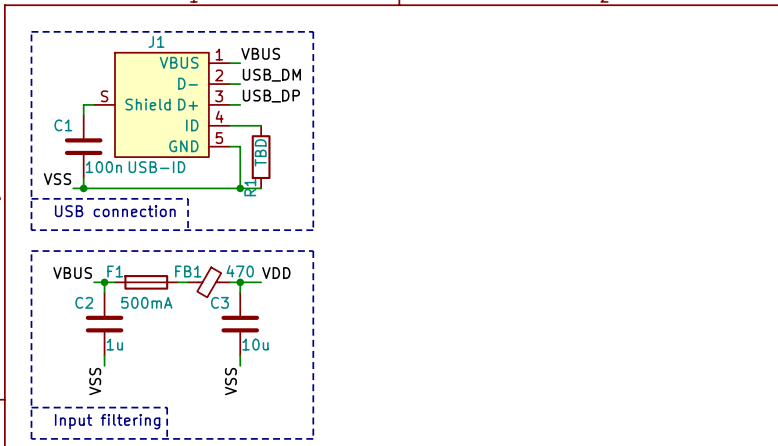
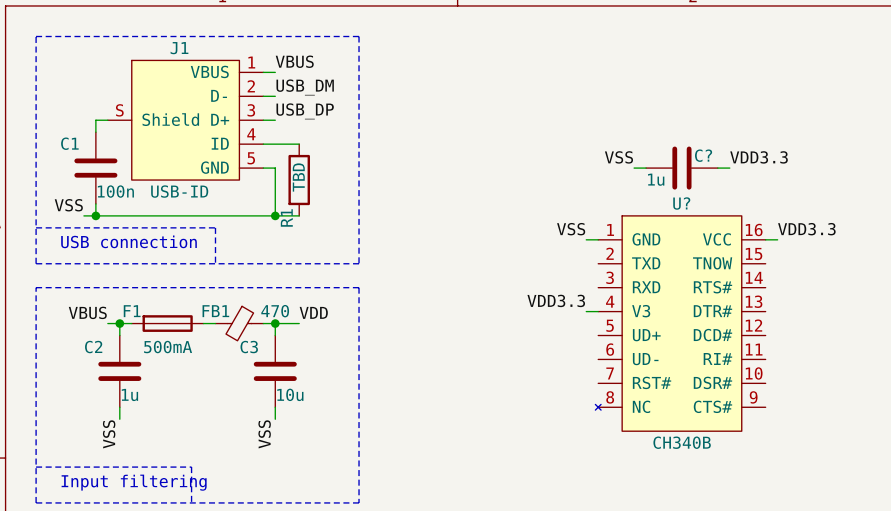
label: none -> VSS (618, 157)
label: none -> VDD3.3 (759, 157)
wire: none -> (634, 168) (646, 168)
C?: none -> 1u (681, 168)
wire: none -> (717, 168) (729, 168)
label: none -> VSS (571, 229)
label: none -> VDD3.3 (806, 229)
wire: none -> (586, 239) (598, 239)
wire: none -> (765, 239) (777, 239)
label: none -> VDD3.3 (556, 300)
wire: none -> (586, 311) (598, 311)
U?: none -> CH340B (680, 323)

